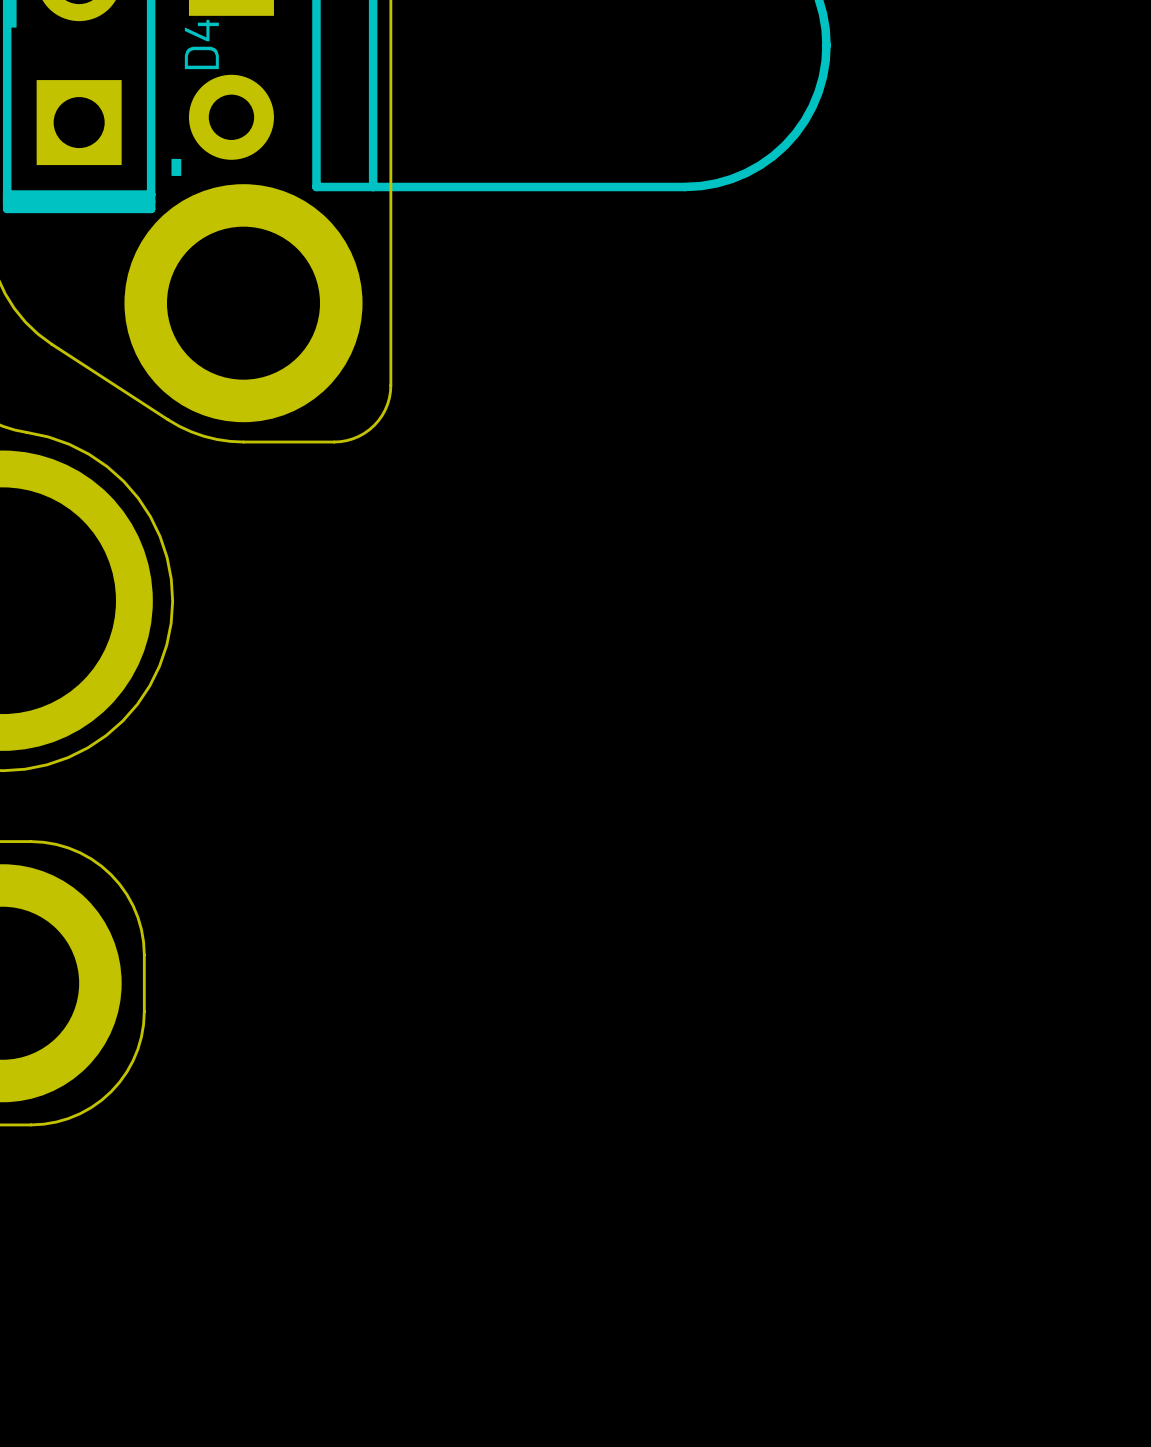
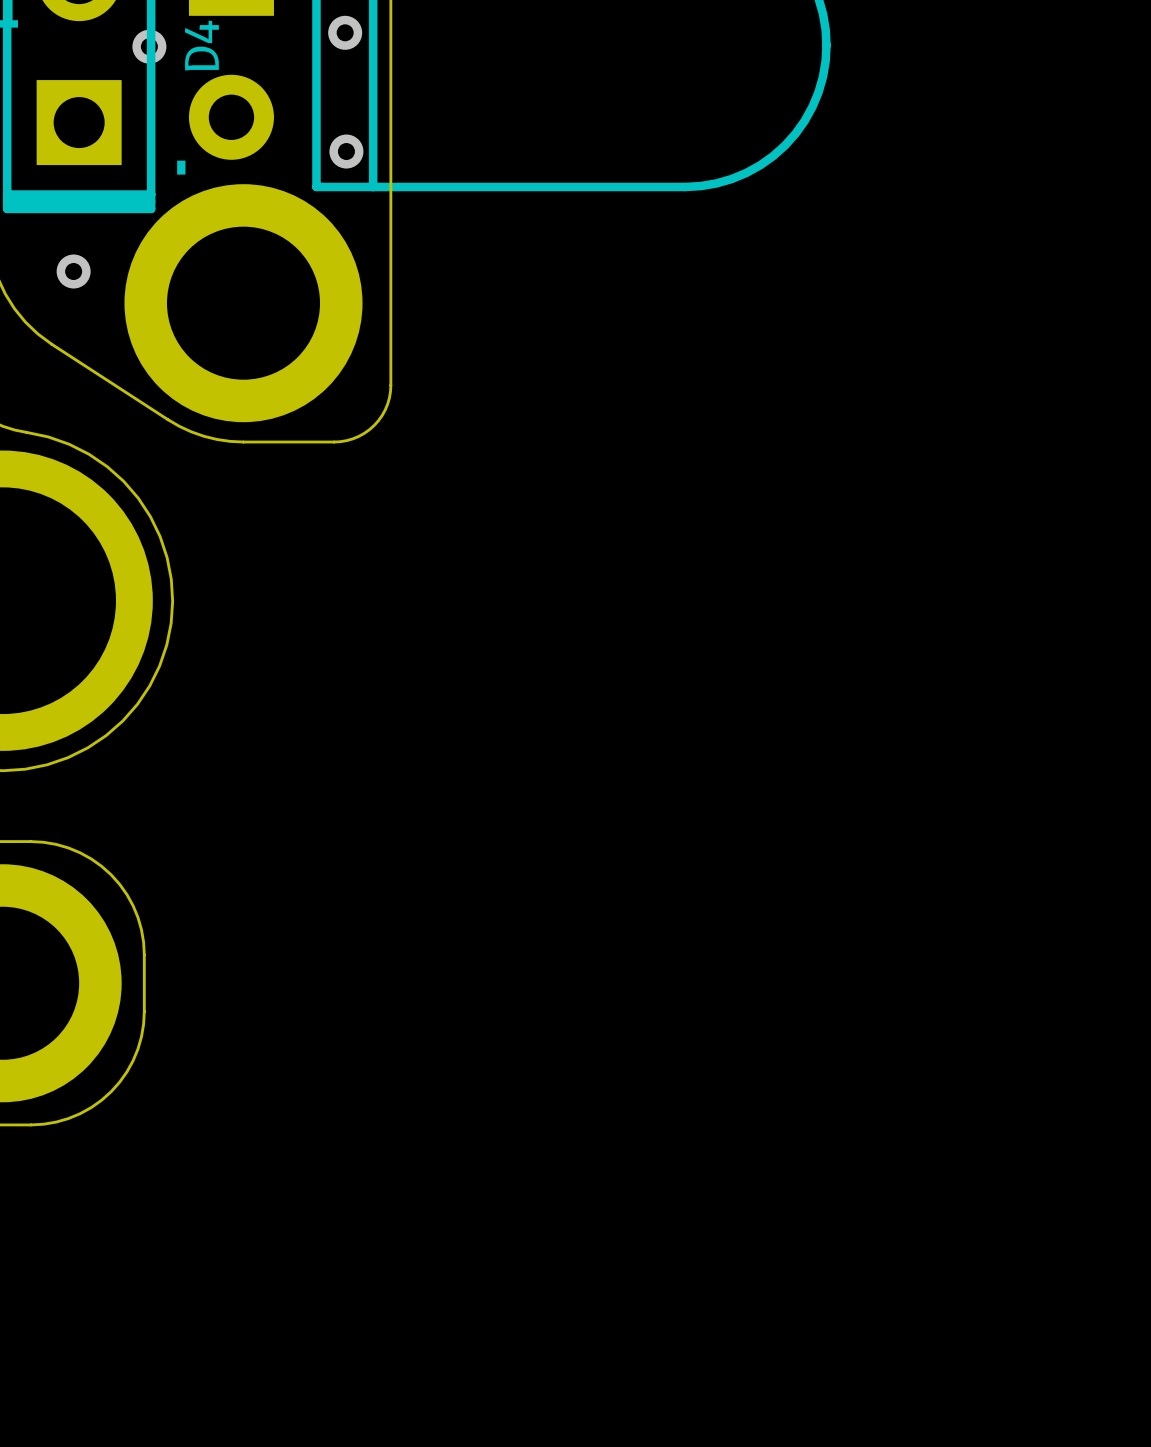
via: none -> (345, 32)
via: none -> (149, 46)
via: none -> (346, 151)
via: none -> (73, 271)

